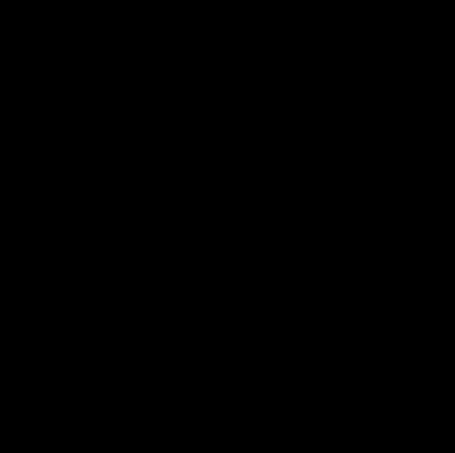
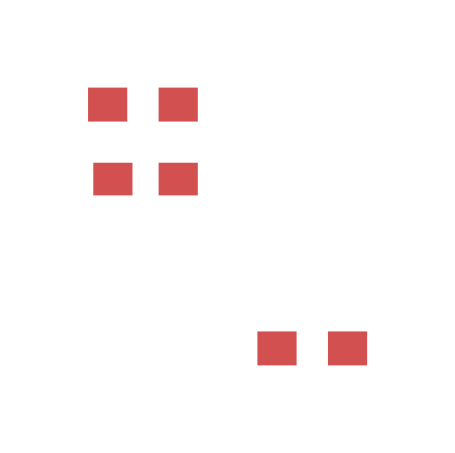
part: none -> (142, 104)
part: none -> (145, 179)
part: none -> (312, 348)

